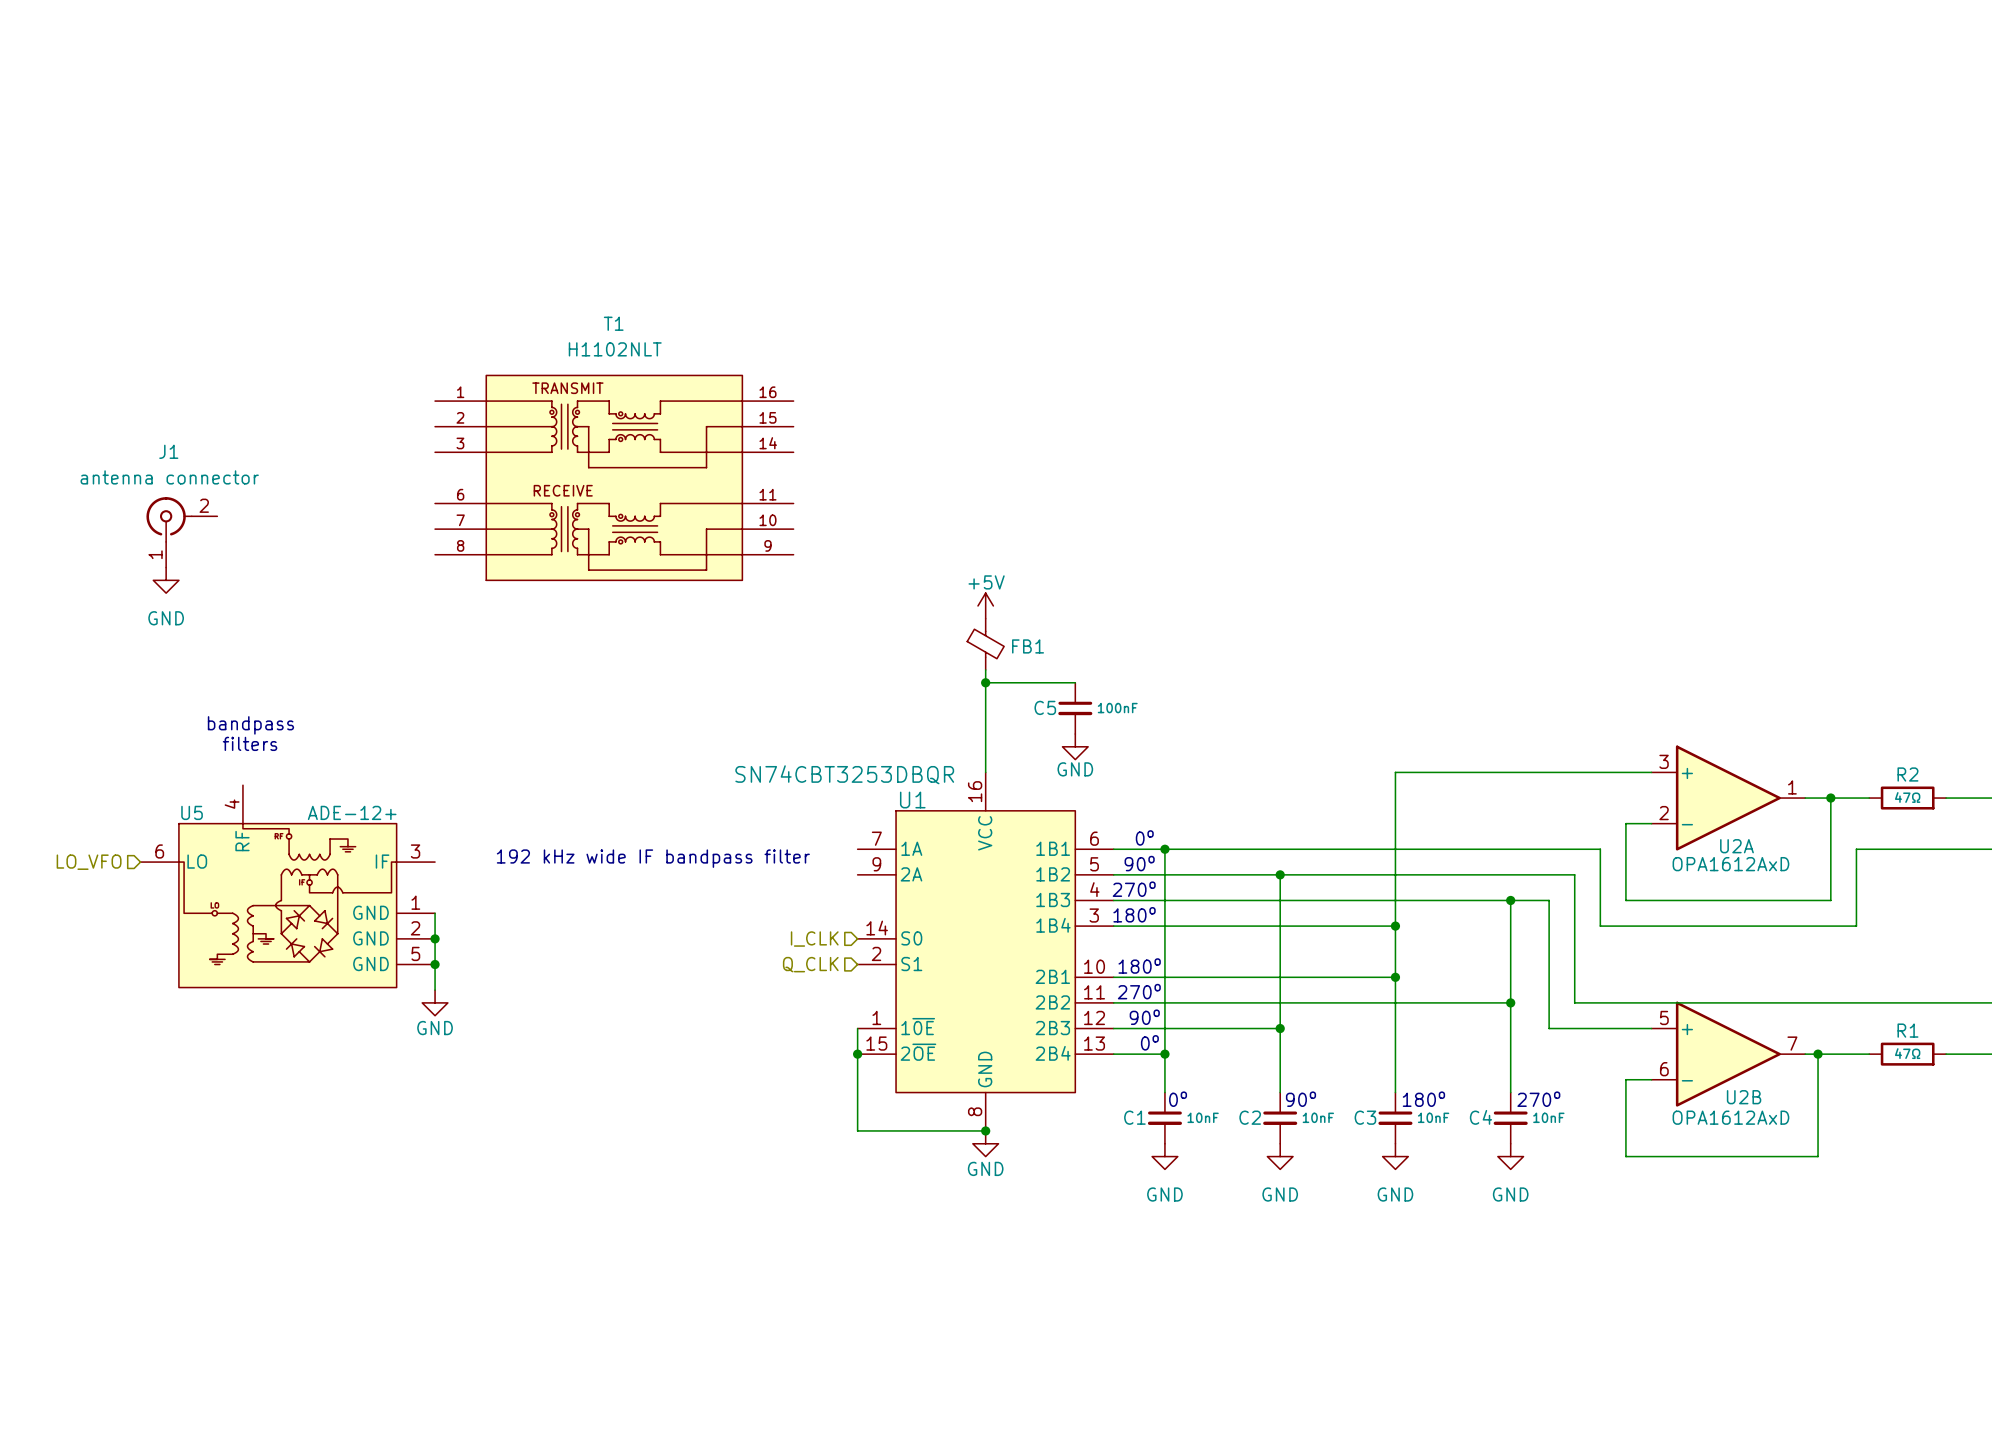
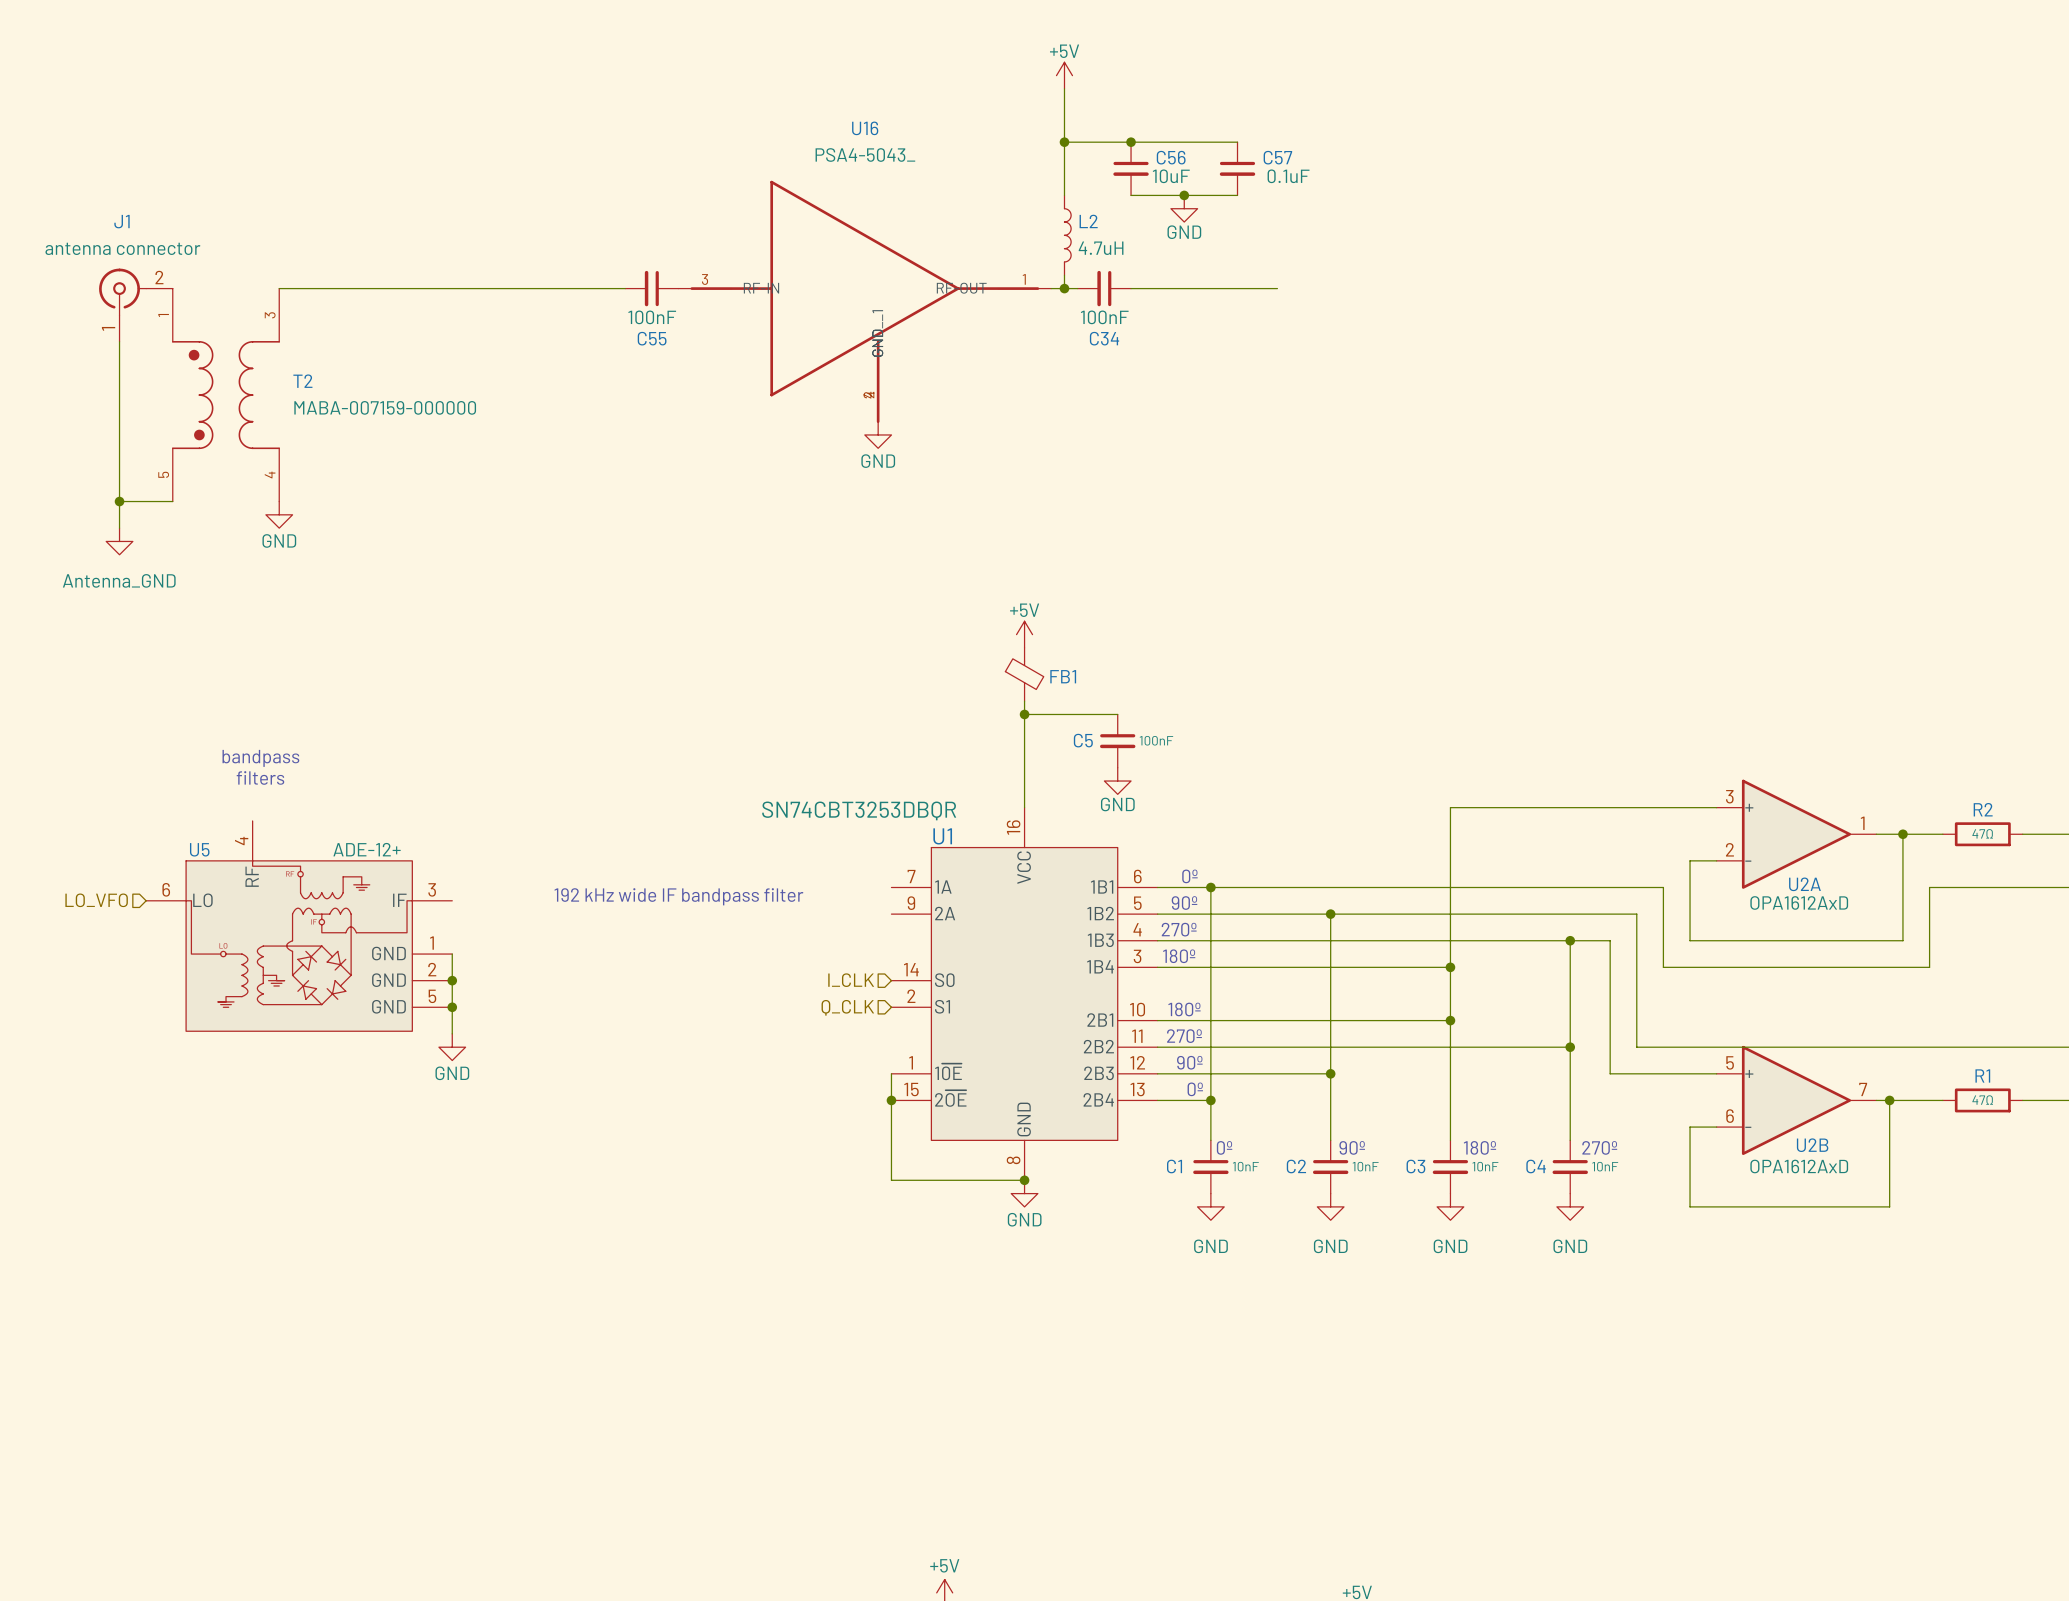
power symbol: none -> +5V (1064, 75)
wire: none -> (1064, 88) (1064, 195)
wire: none -> (1064, 142) (1237, 142)
junction: none -> (1064, 142)
junction: none -> (1131, 142)
C56: none -> 10uF (1131, 168)
C57: none -> 0.1uF (1237, 168)
wire: none -> (1131, 195) (1237, 195)
junction: none -> (1184, 195)
power symbol: none -> GND (1184, 208)
L2: none -> 4.7uH (1067, 235)
wire: none -> (1064, 275) (1064, 288)
wire: none -> (279, 288) (625, 288)
C55: none -> 100nF (651, 288)
wire: none -> (1051, 288) (1077, 288)
junction: none -> (1064, 288)
C34: none -> 100nF (1104, 288)
wire: none -> (1131, 288) (1277, 288)
U16: none -> PSA4-5043_ (864, 301)
wire: none -> (119, 341) (119, 528)
T2: none -> MABA-007159-000000 (226, 395)
power symbol: none -> GND (878, 434)
wire: none -> (119, 501) (172, 501)
junction: none -> (119, 501)
T1: H1102NLT (614, 477) -> none
power symbol: none -> Antenna_GND (119, 541)
J1 position: (181, 532) -> (135, 305)
power symbol position: GND (166, 580) -> GND (279, 514)
power symbol text position: GND (166, 618) -> GND (279, 540)

